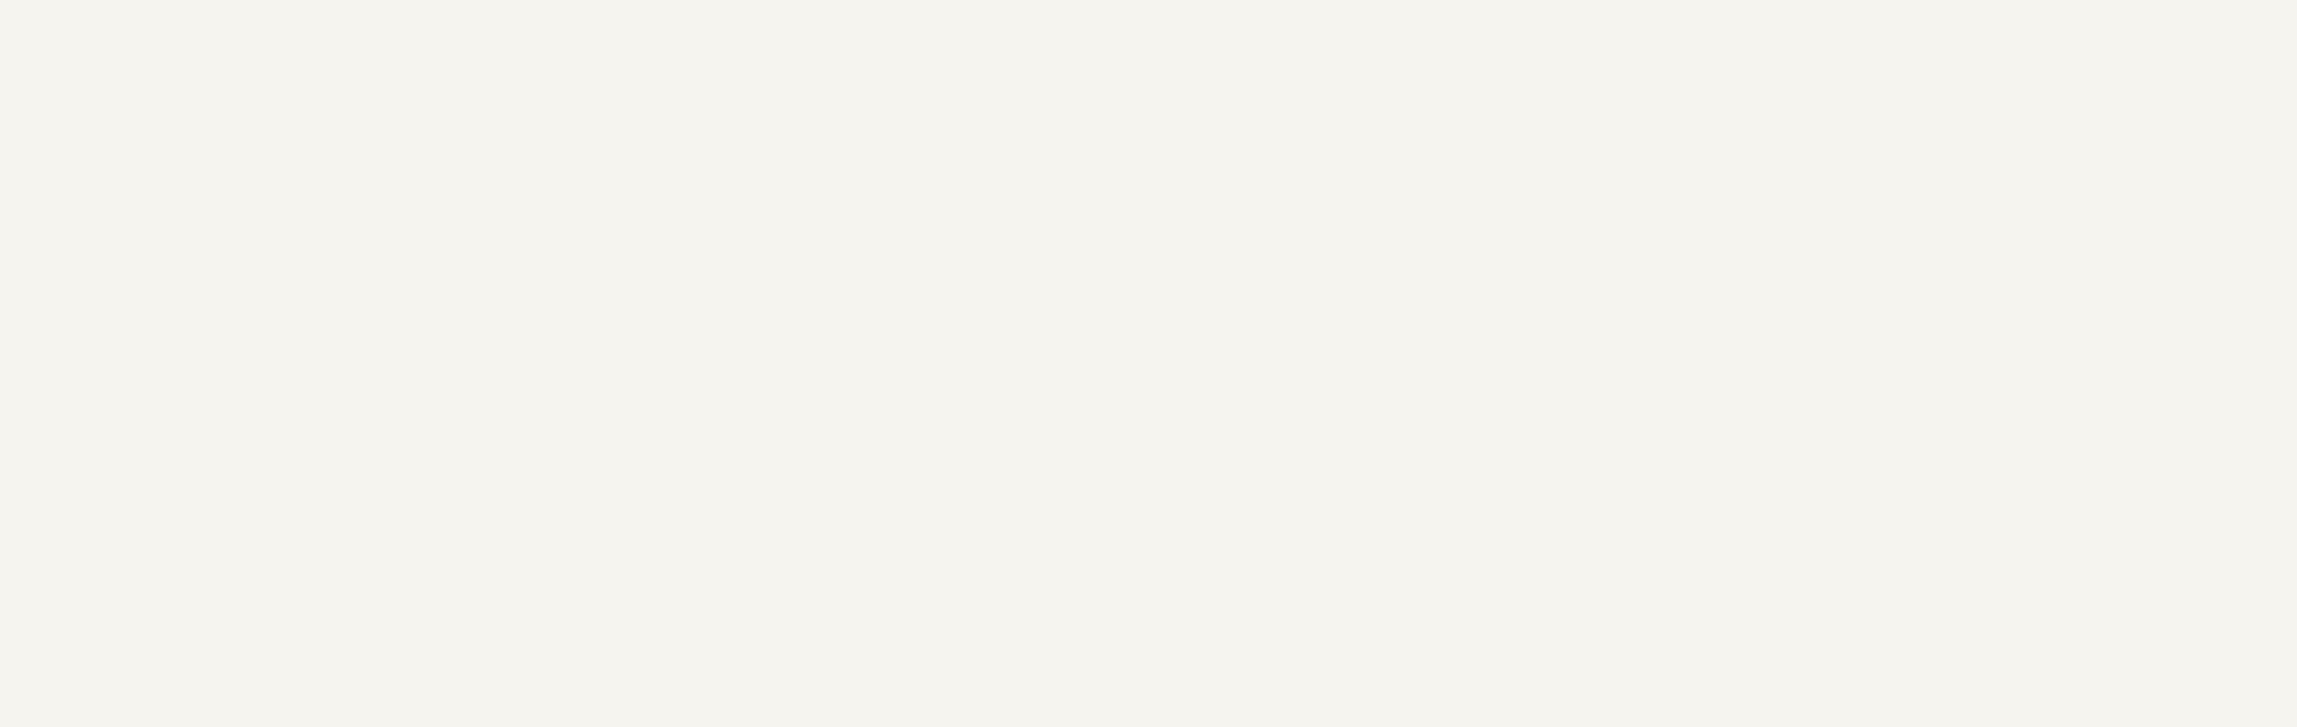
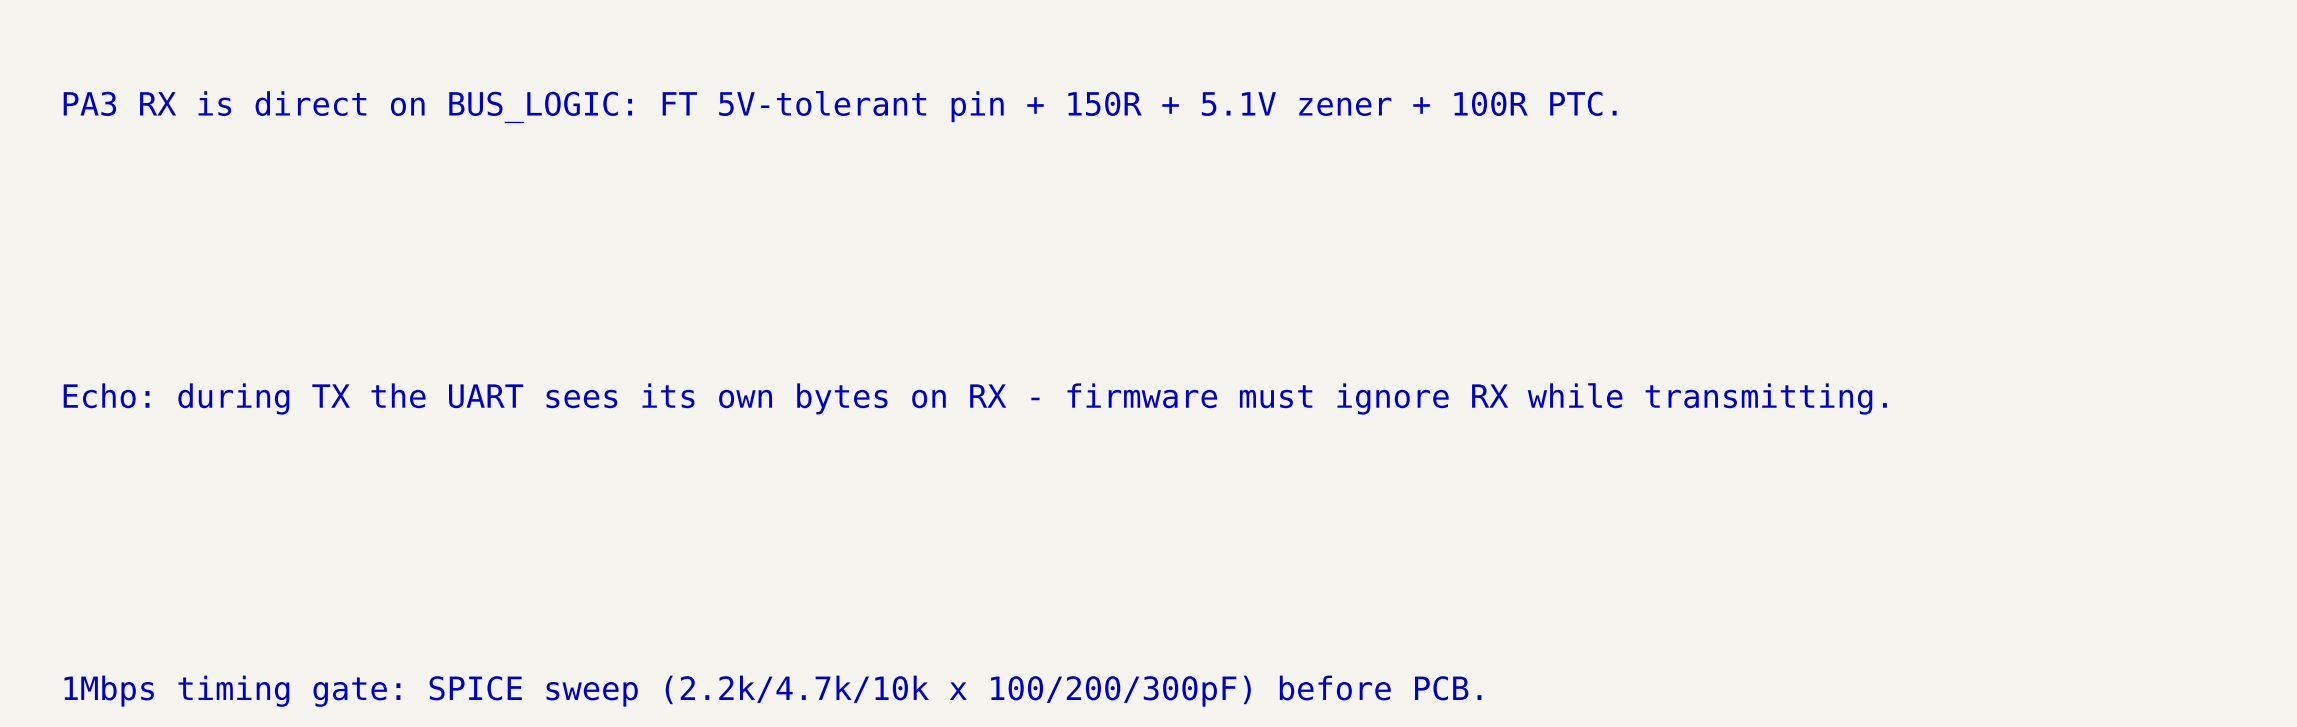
text: none -> PA3 RX is direct on BUS_LOGIC: FT 5V-tolerant pin + 150R + 5.1V zener + 100R PTC. (840, 107)
text: none -> Echo: during TX the UART sees its own bytes on RX - firmware must ignore RX while transmitting. (975, 398)
text: none -> 1Mbps timing gate: SPICE sweep (2.2k/4.7k/10k x 100/200/300pF) before PCB. (772, 691)

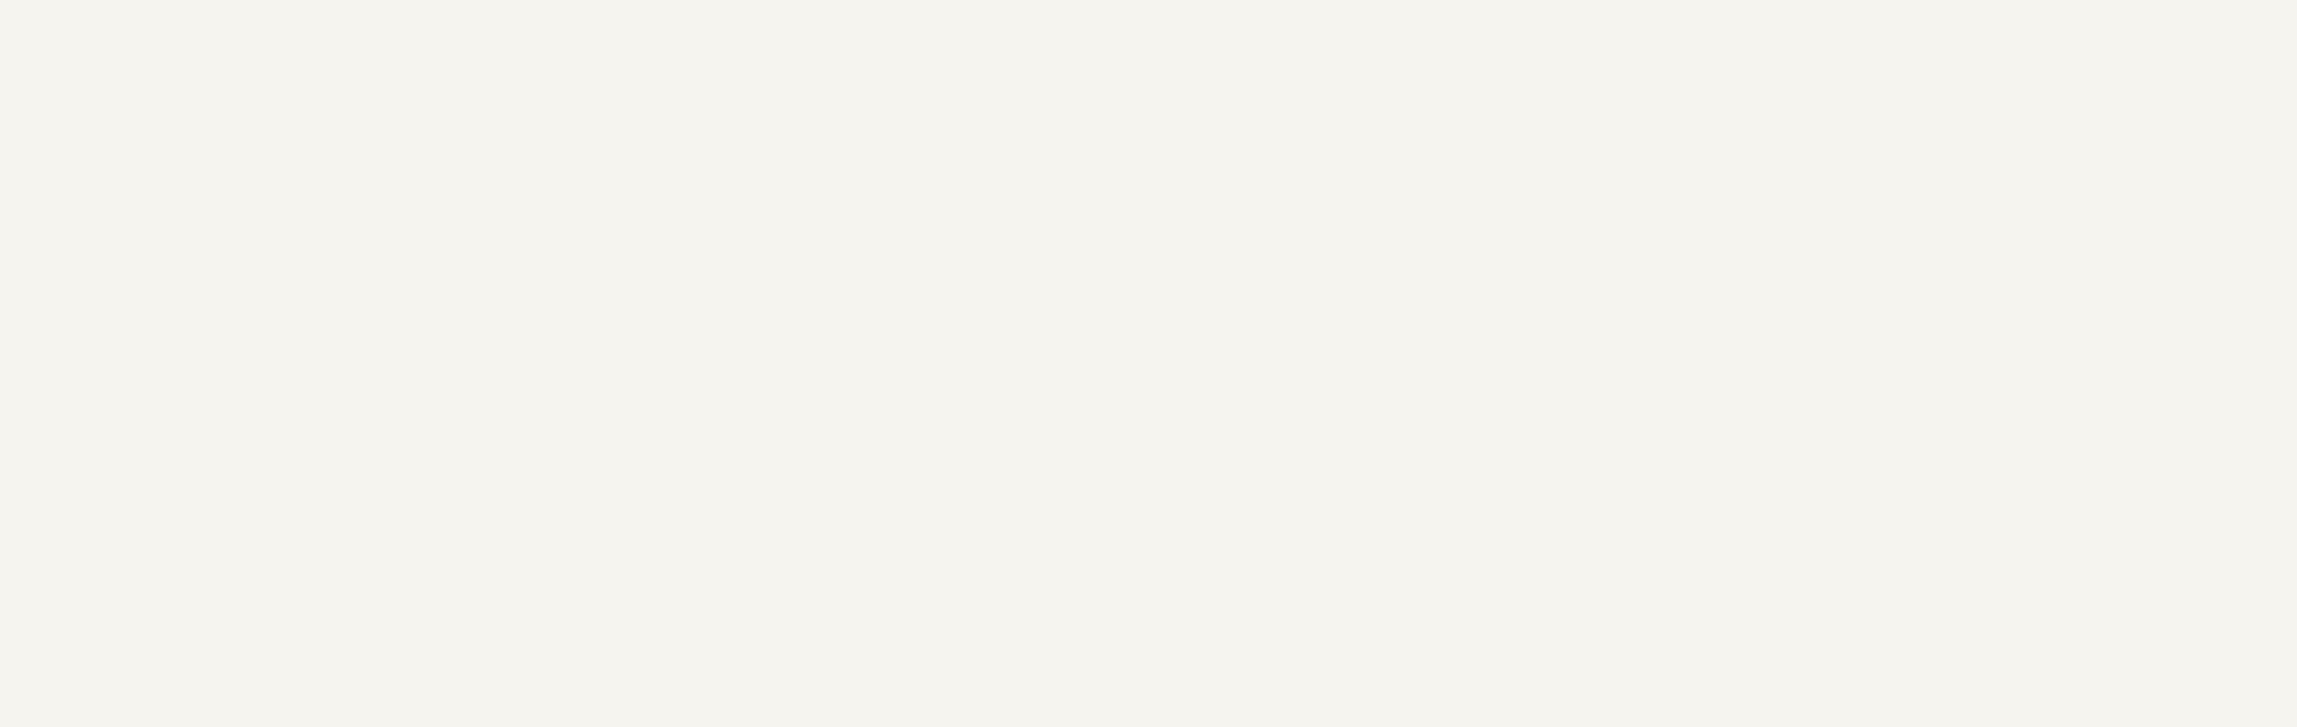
text: PA3 RX is direct on BUS_LOGIC: FT 5V-tolerant pin + 150R + 5.1V zener + 100R PTC. (840, 107) -> none
text: Echo: during TX the UART sees its own bytes on RX - firmware must ignore RX while transmitting. (975, 398) -> none
text: 1Mbps timing gate: SPICE sweep (2.2k/4.7k/10k x 100/200/300pF) before PCB. (772, 691) -> none

